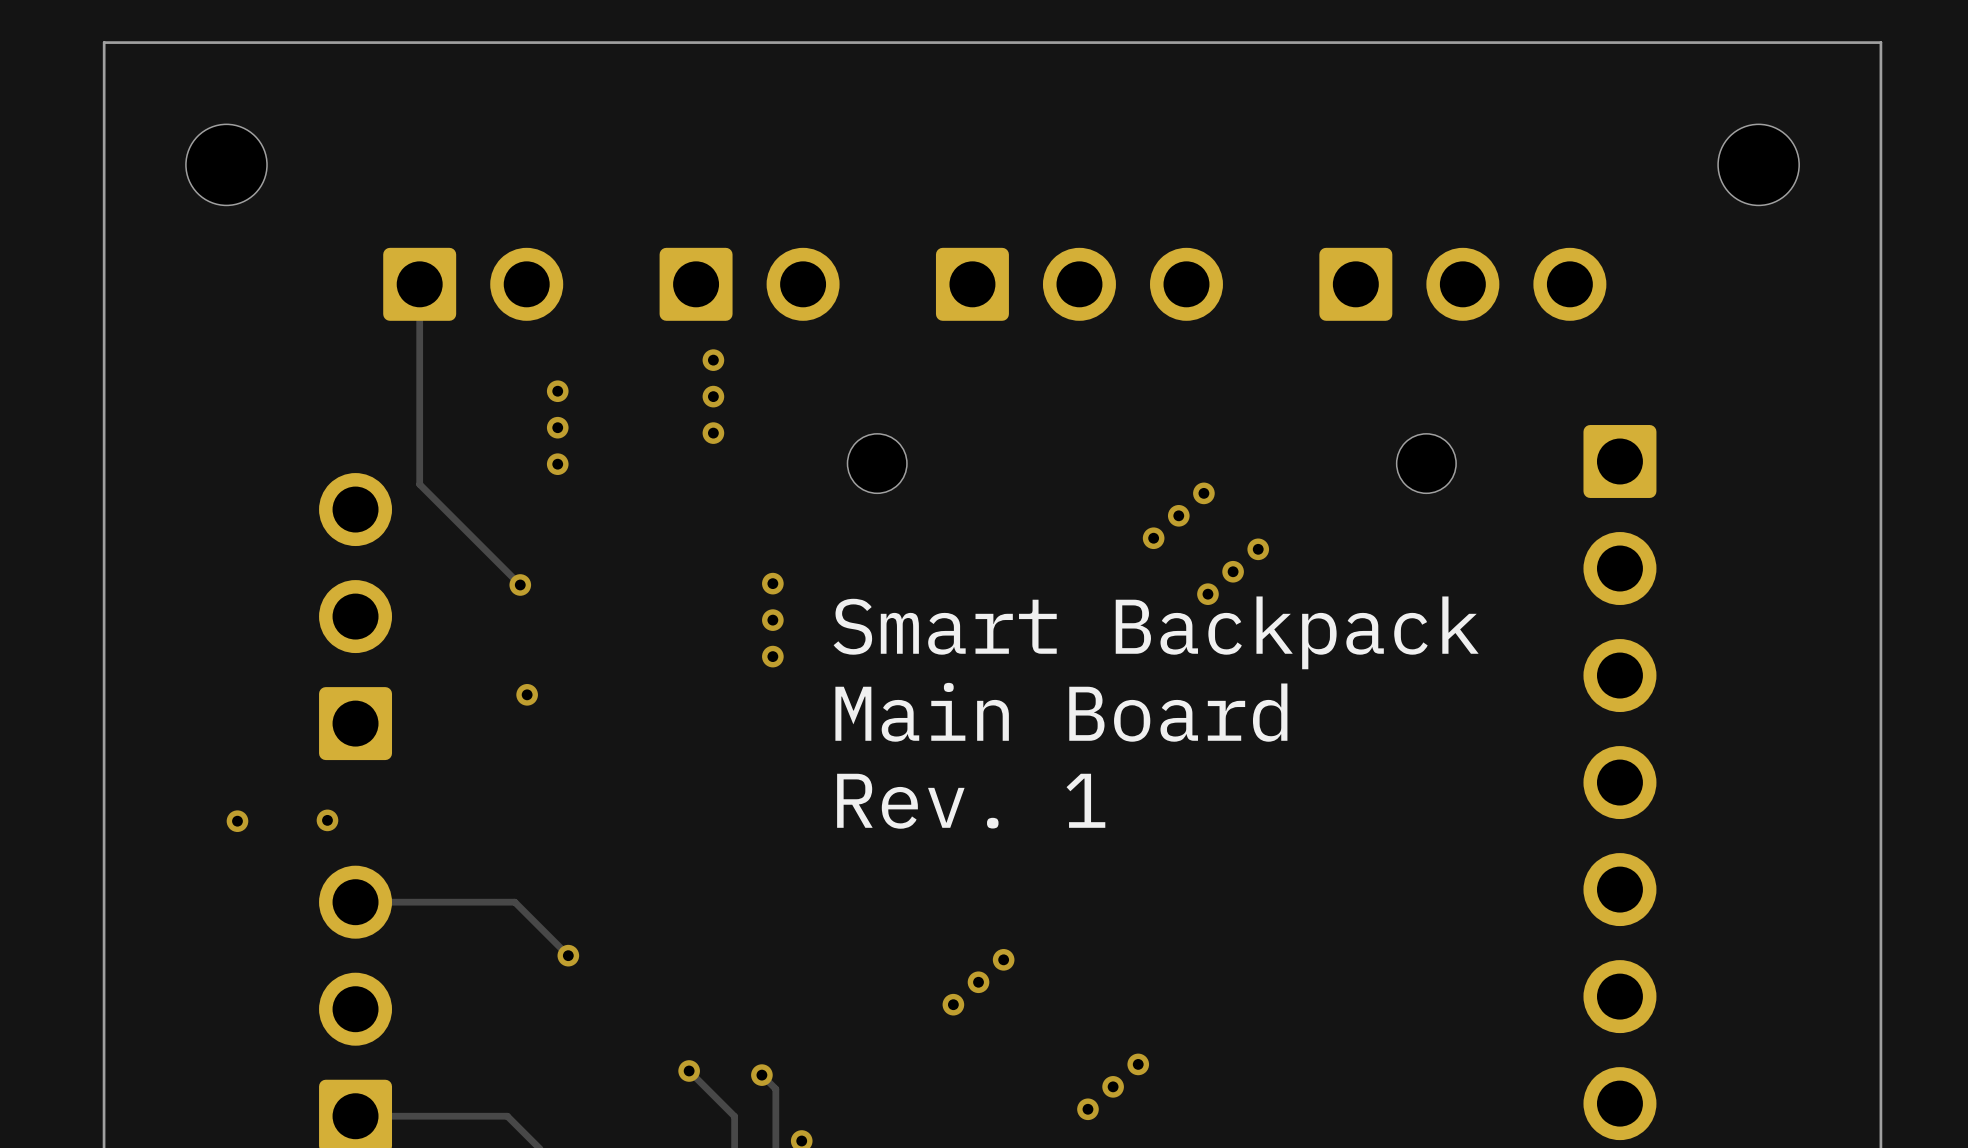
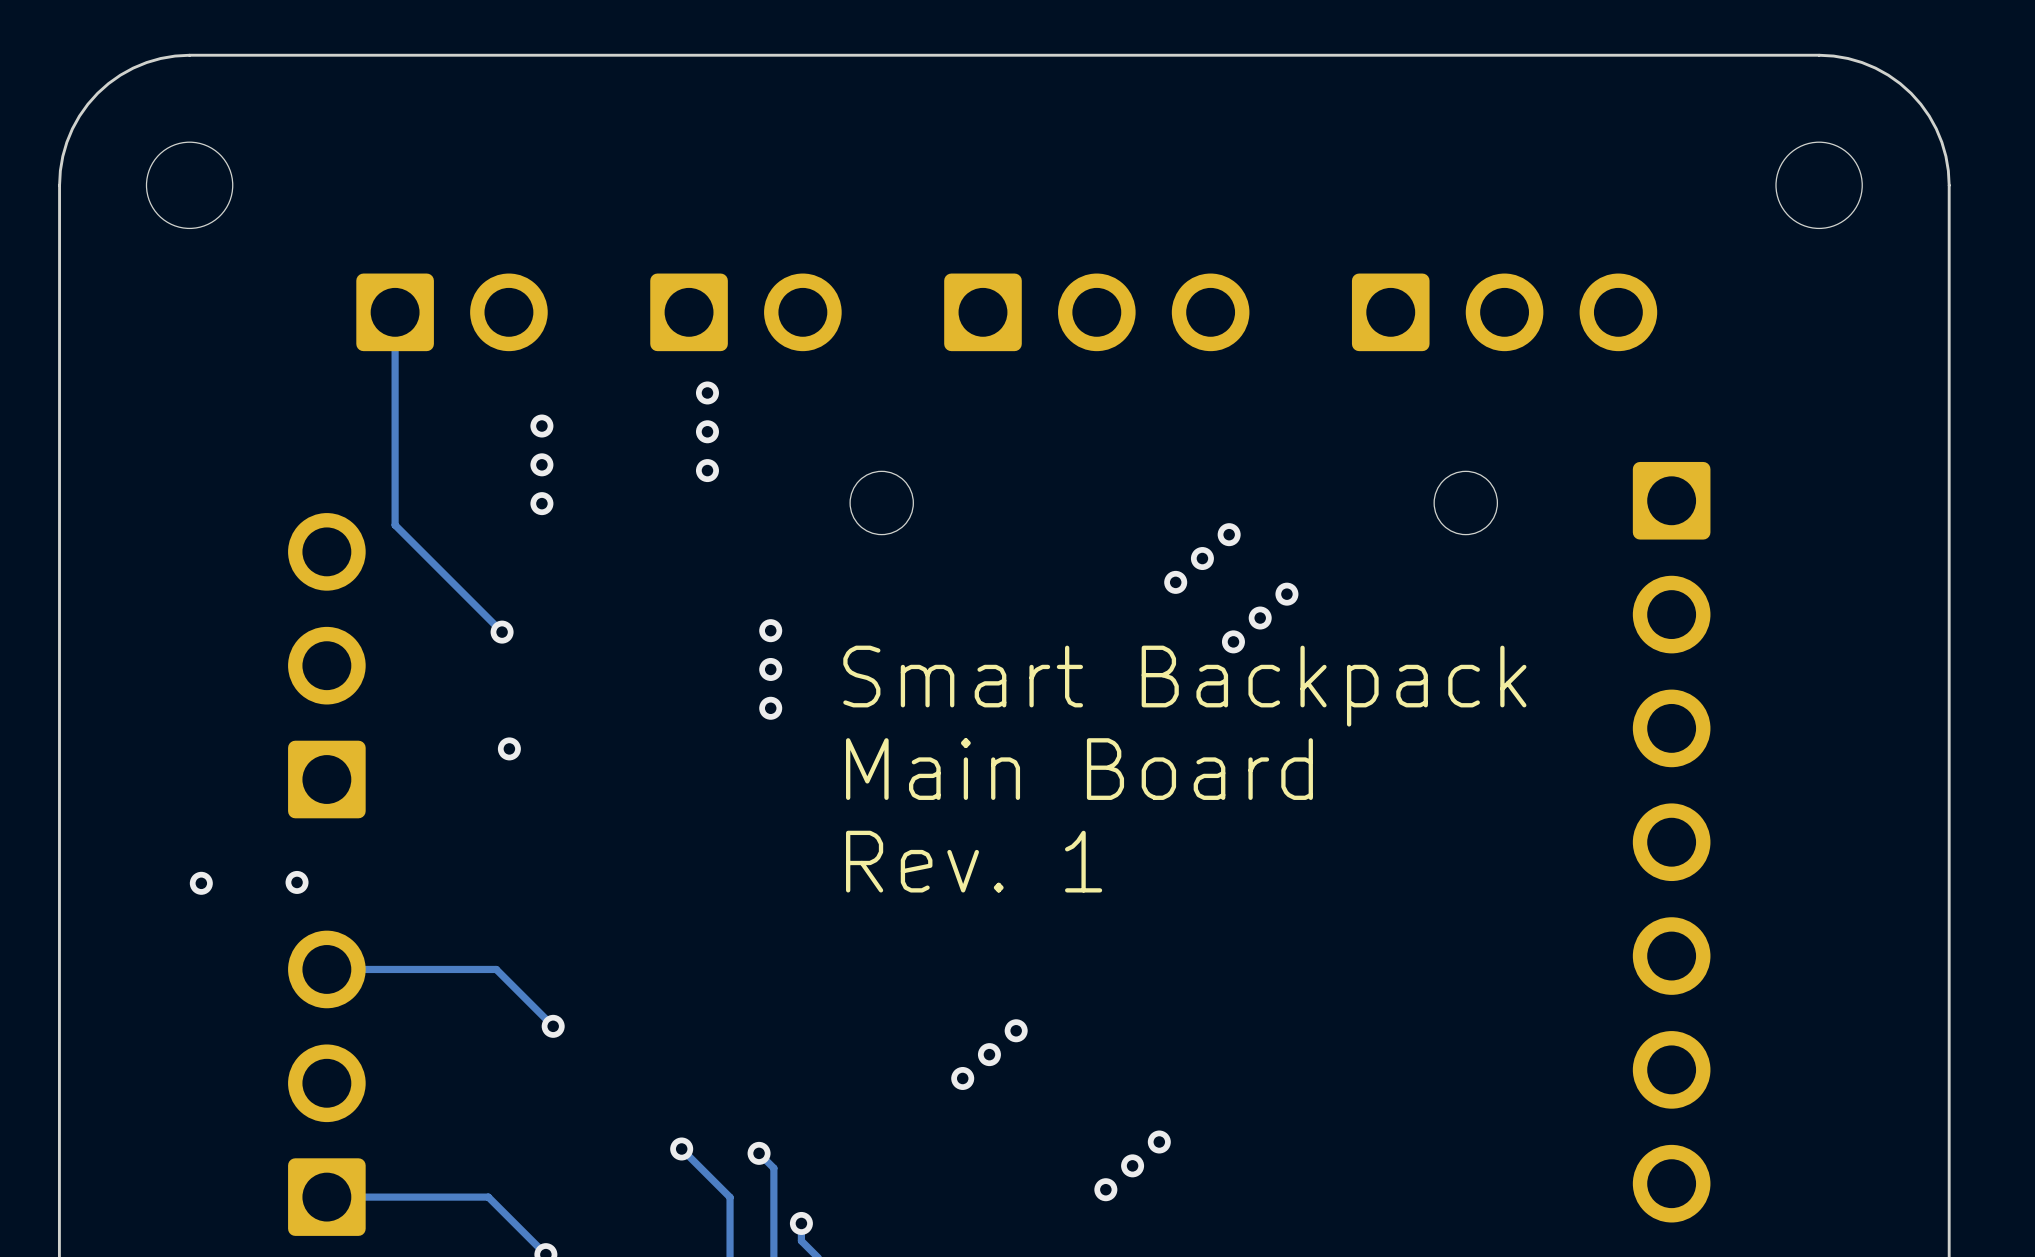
board edge: (226, 42) (104, 42) (104, 164) -> (189, 55) (160, 58) (146, 62) (120, 75) (97, 93) (79, 116) (72, 128) (62, 156) (59, 185)
board edge: (1758, 42) (1880, 42) (1880, 164) -> (1819, 55) (1848, 58) (1875, 68) (1900, 83) (1911, 93) (1929, 116) (1941, 142) (1948, 170) (1949, 185)

